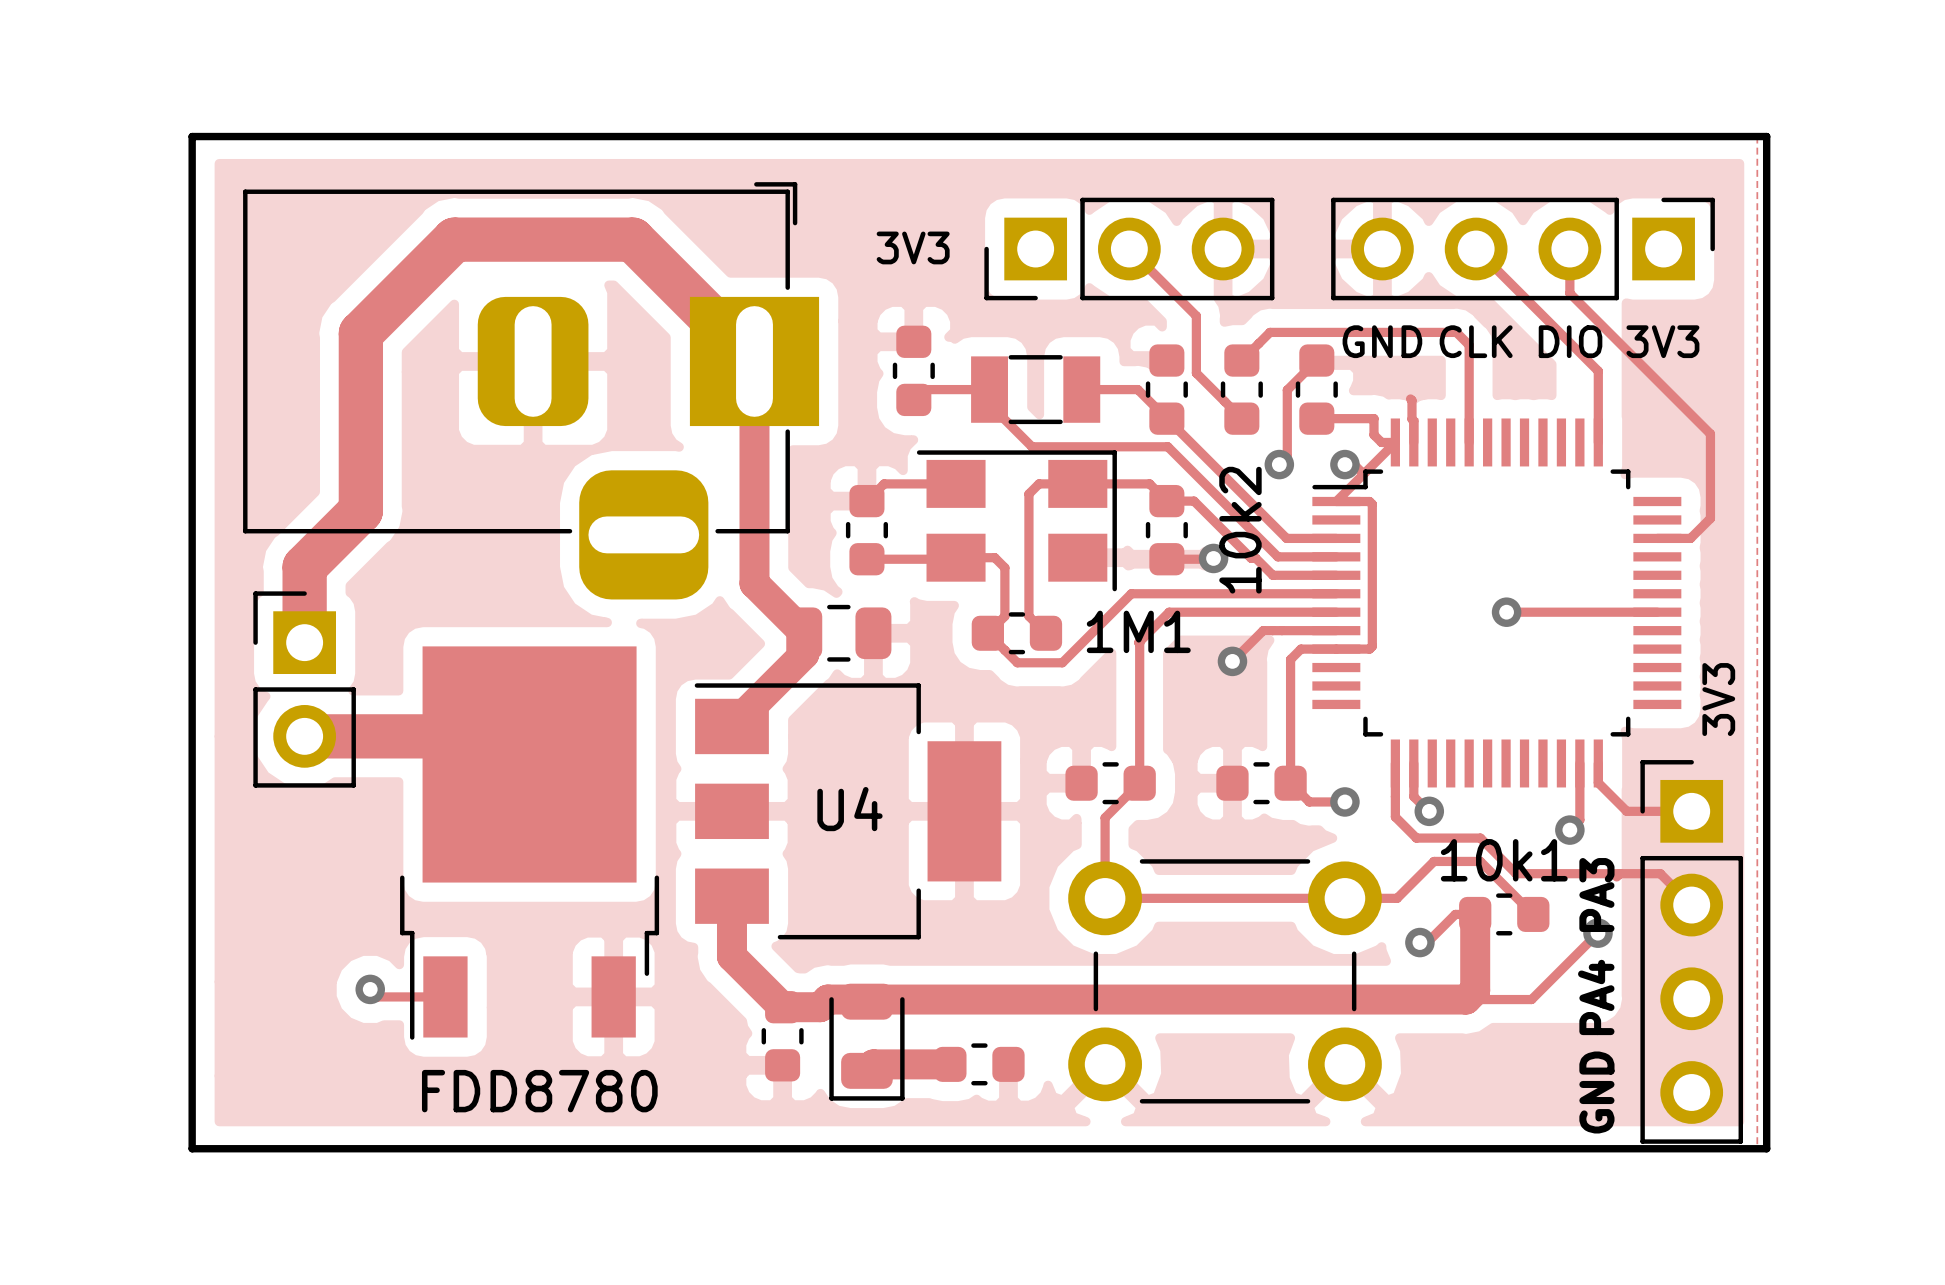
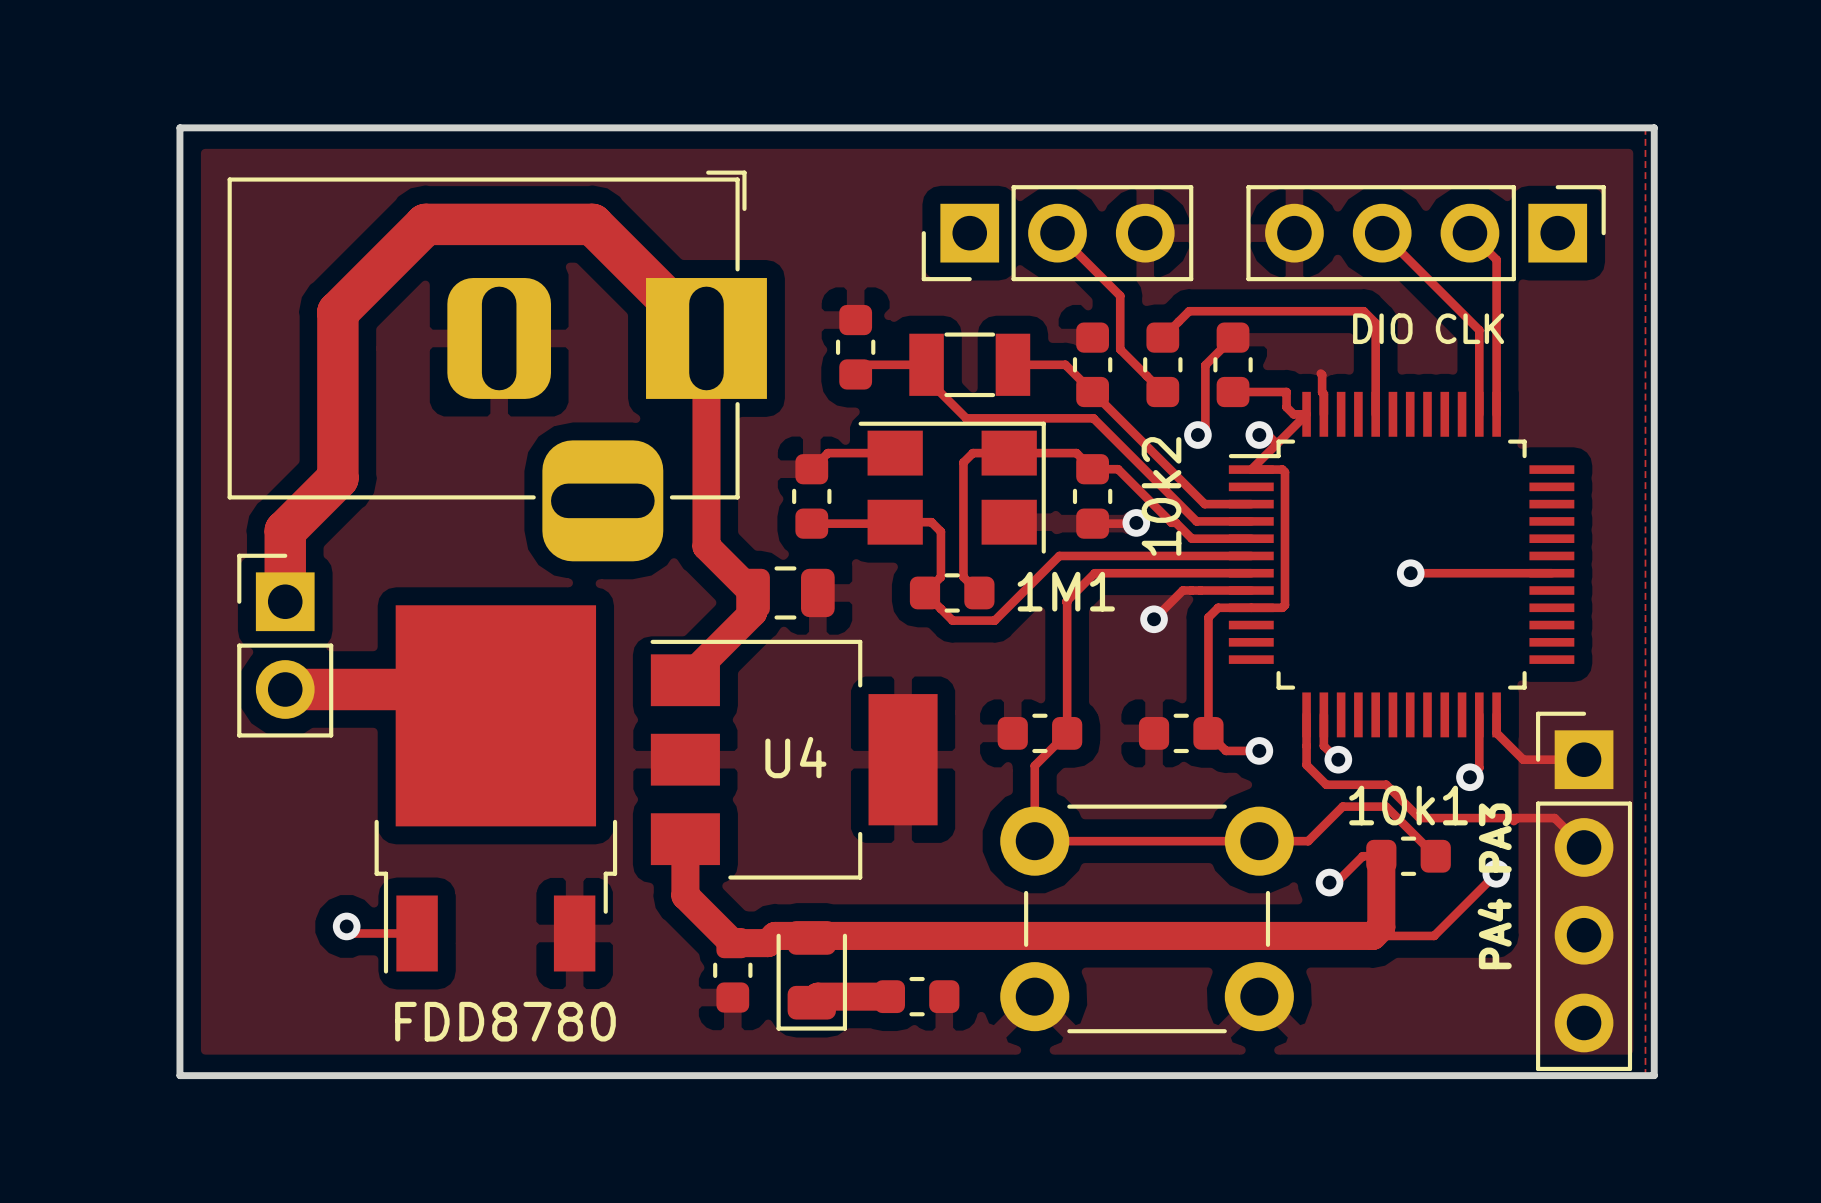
text: 3V3 (913, 247) -> none
track: (1569, 249) (1569, 293) (1710, 433) (1710, 518) (1690, 538) (1657, 538) -> (1469, 233) (1496, 259) (1496, 347)
text: GND (1382, 341) -> none
text: CLK (1476, 341) -> DIO (1382, 328)
text: DIO (1570, 341) -> CLK (1469, 328)
text: 3V3 (1662, 341) -> none
track: (1579, 352) (1598, 371) -> (1479, 330) (1479, 414)
text: 3V3 (1718, 699) -> none
text: GND (1596, 1092) -> none

